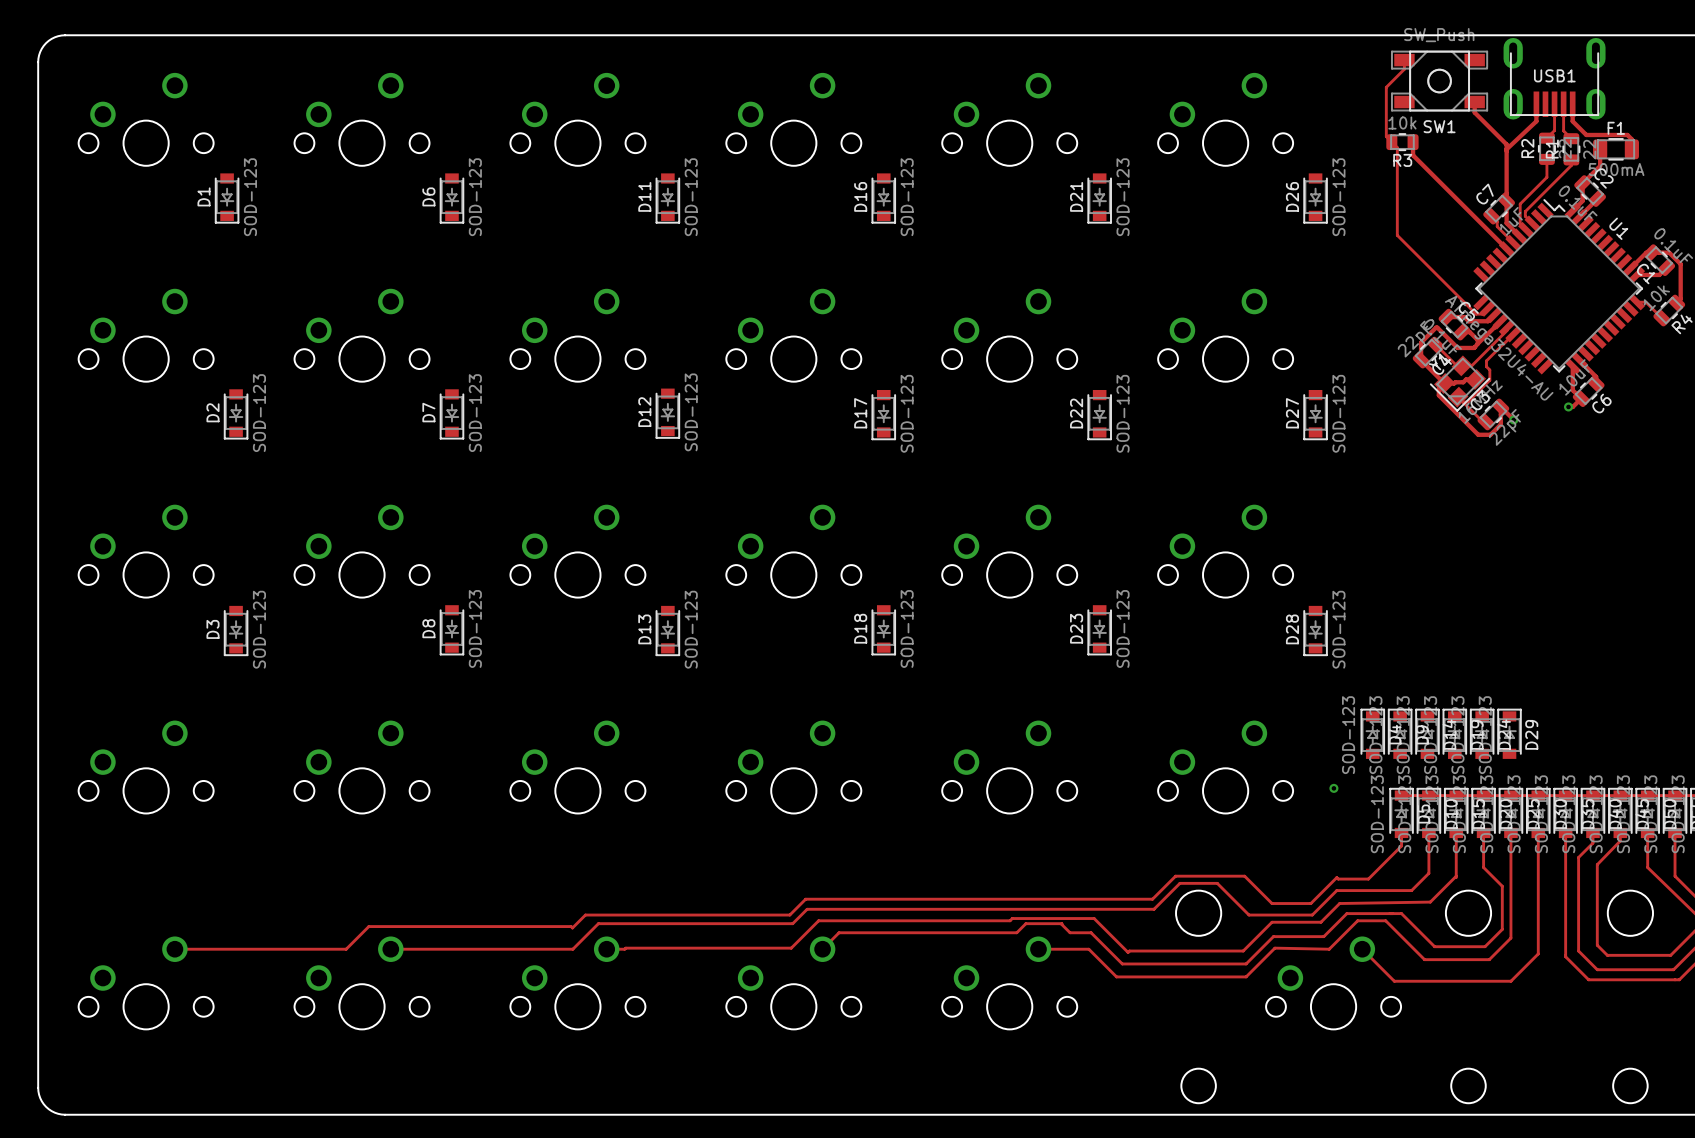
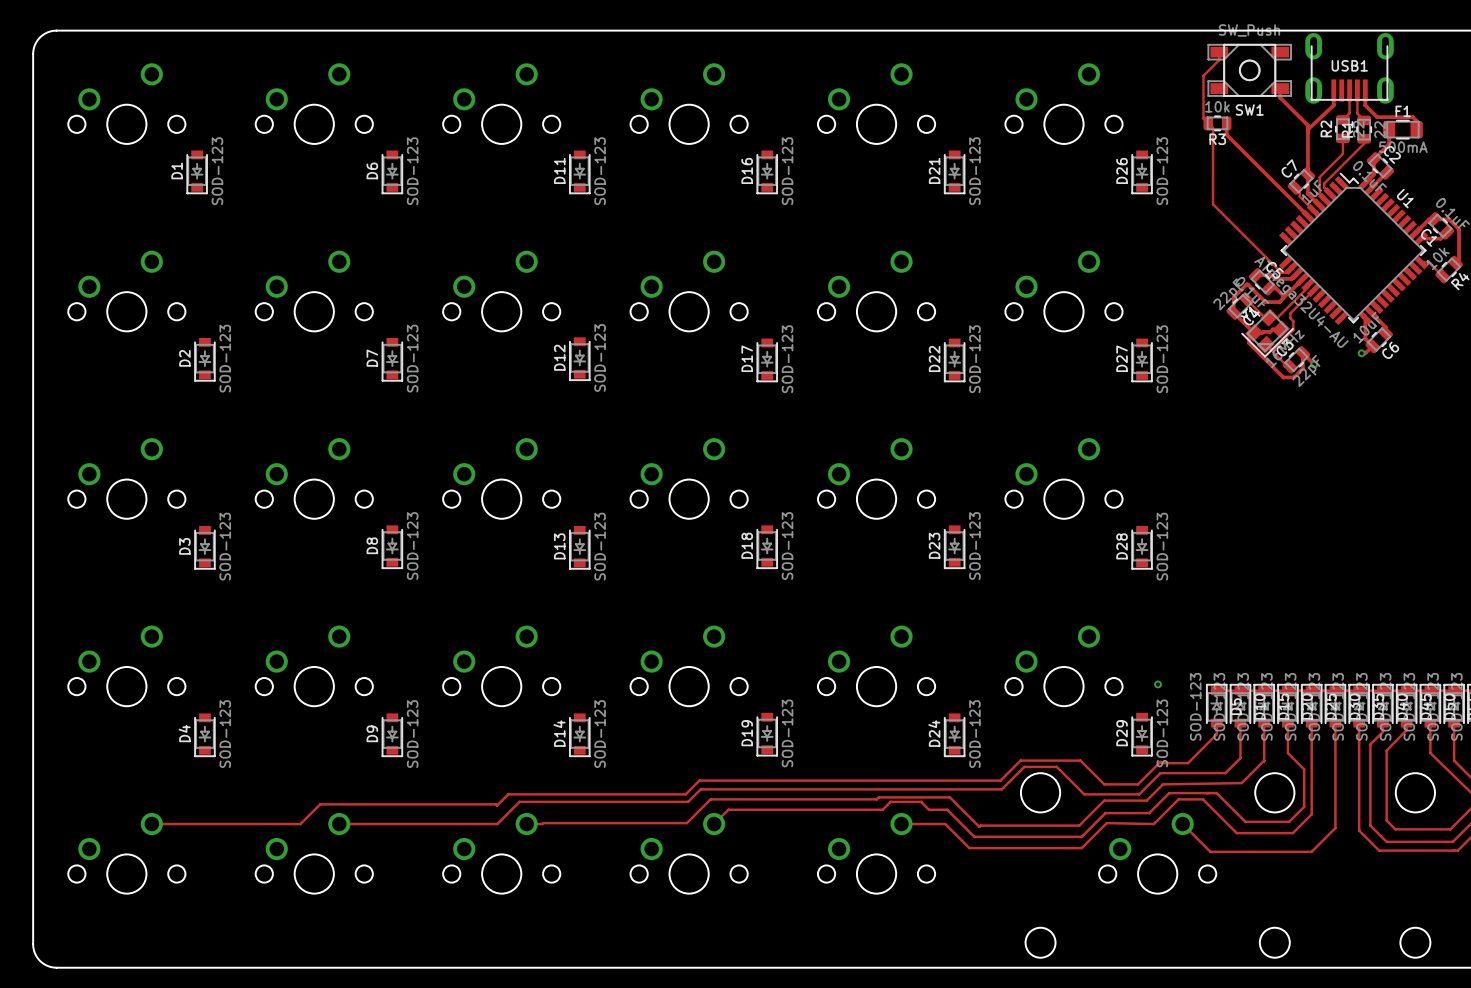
D4 rotation: 0° (1372, 733) -> 180° (204, 735)
D4 position: (1372, 733) -> (204, 735)
D9 rotation: 0° (1400, 733) -> 180° (392, 735)
D9 position: (1400, 733) -> (392, 735)
D14 rotation: 0° (1427, 733) -> 180° (579, 735)
D14 position: (1427, 733) -> (579, 735)
D19 rotation: 0° (1454, 733) -> 180° (767, 734)
D19 position: (1454, 733) -> (767, 734)
D24 rotation: 0° (1482, 733) -> 180° (954, 735)
D24 position: (1482, 733) -> (954, 735)
D29 rotation: 0° (1509, 733) -> 180° (1142, 734)
D29 position: (1509, 733) -> (1142, 734)

